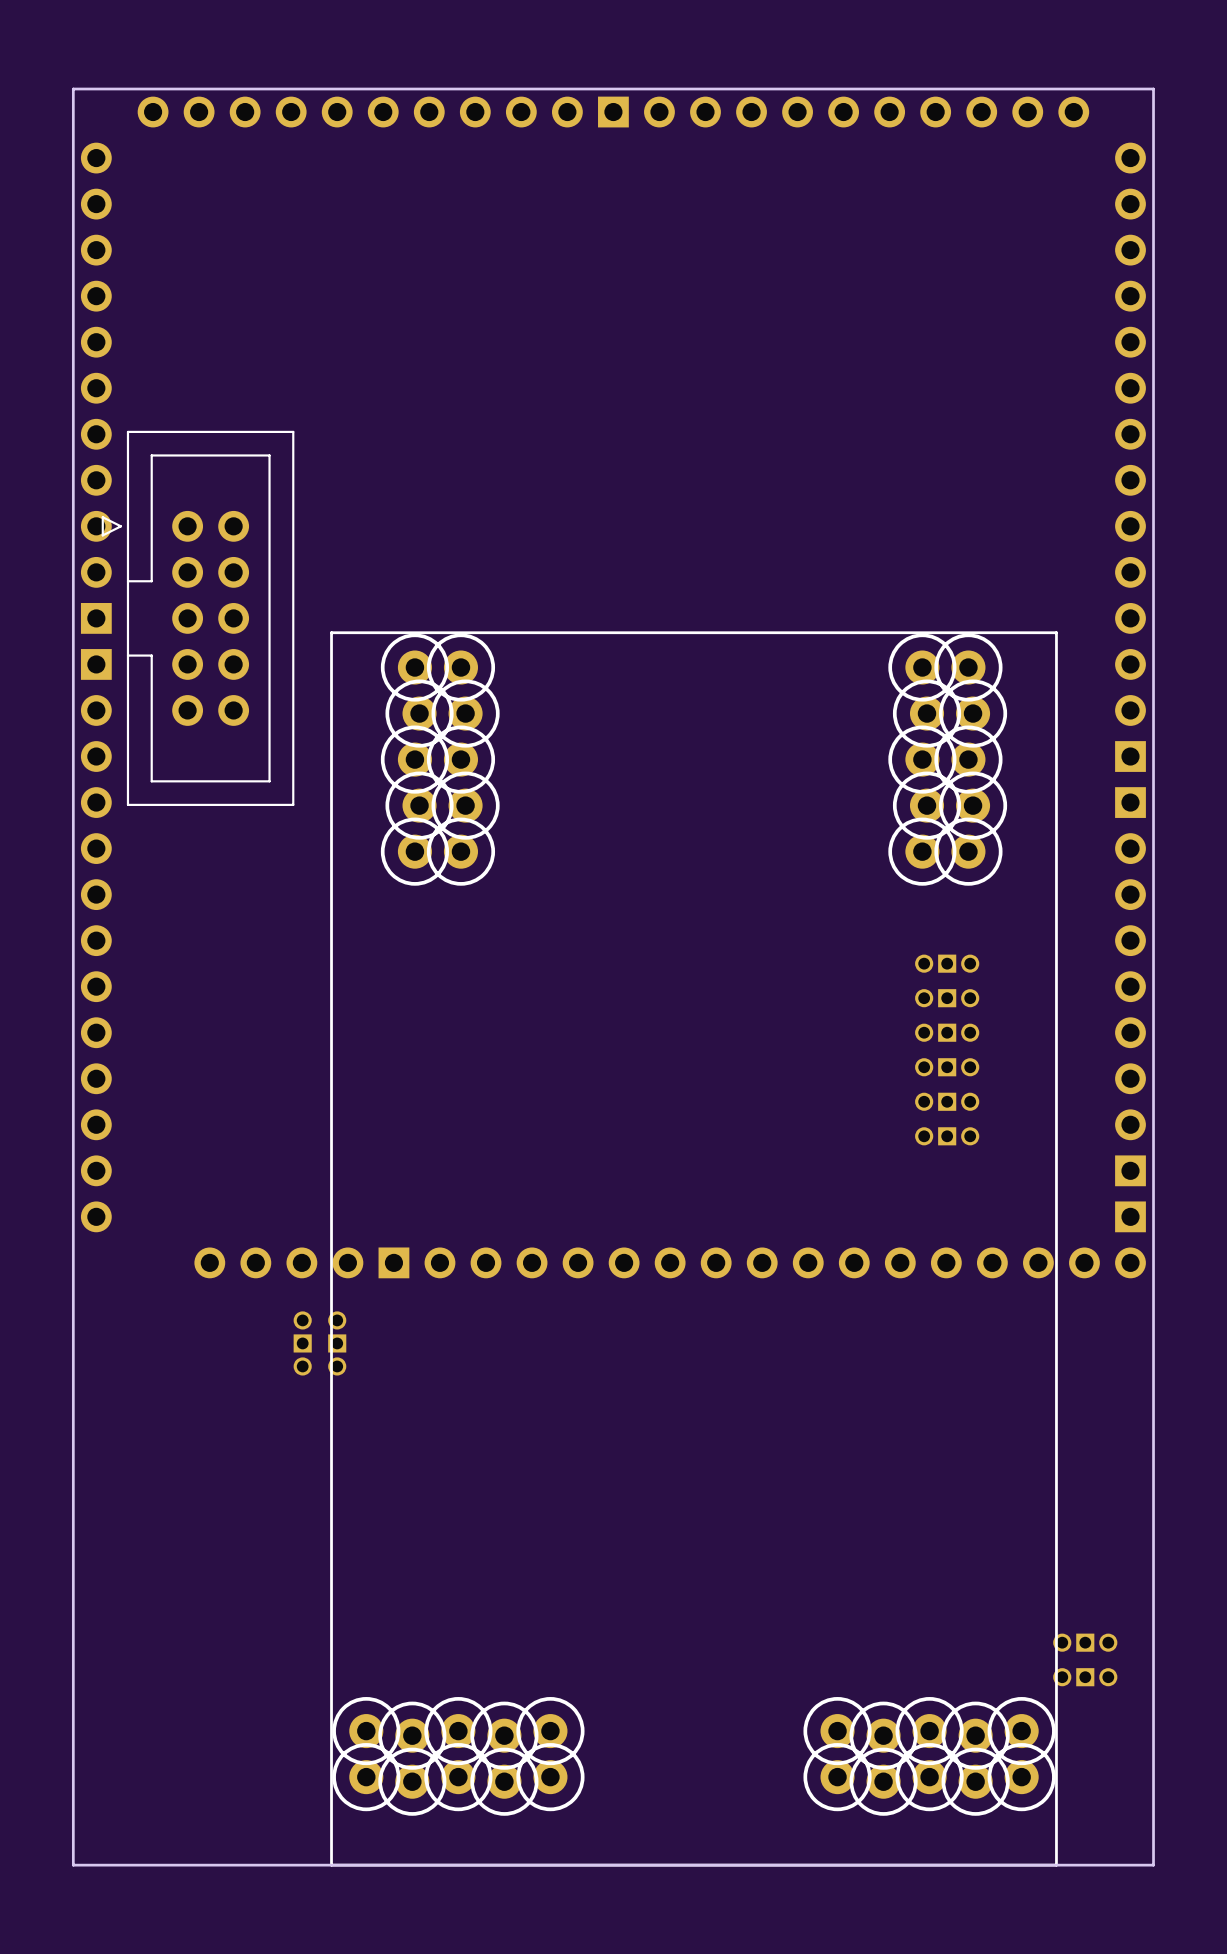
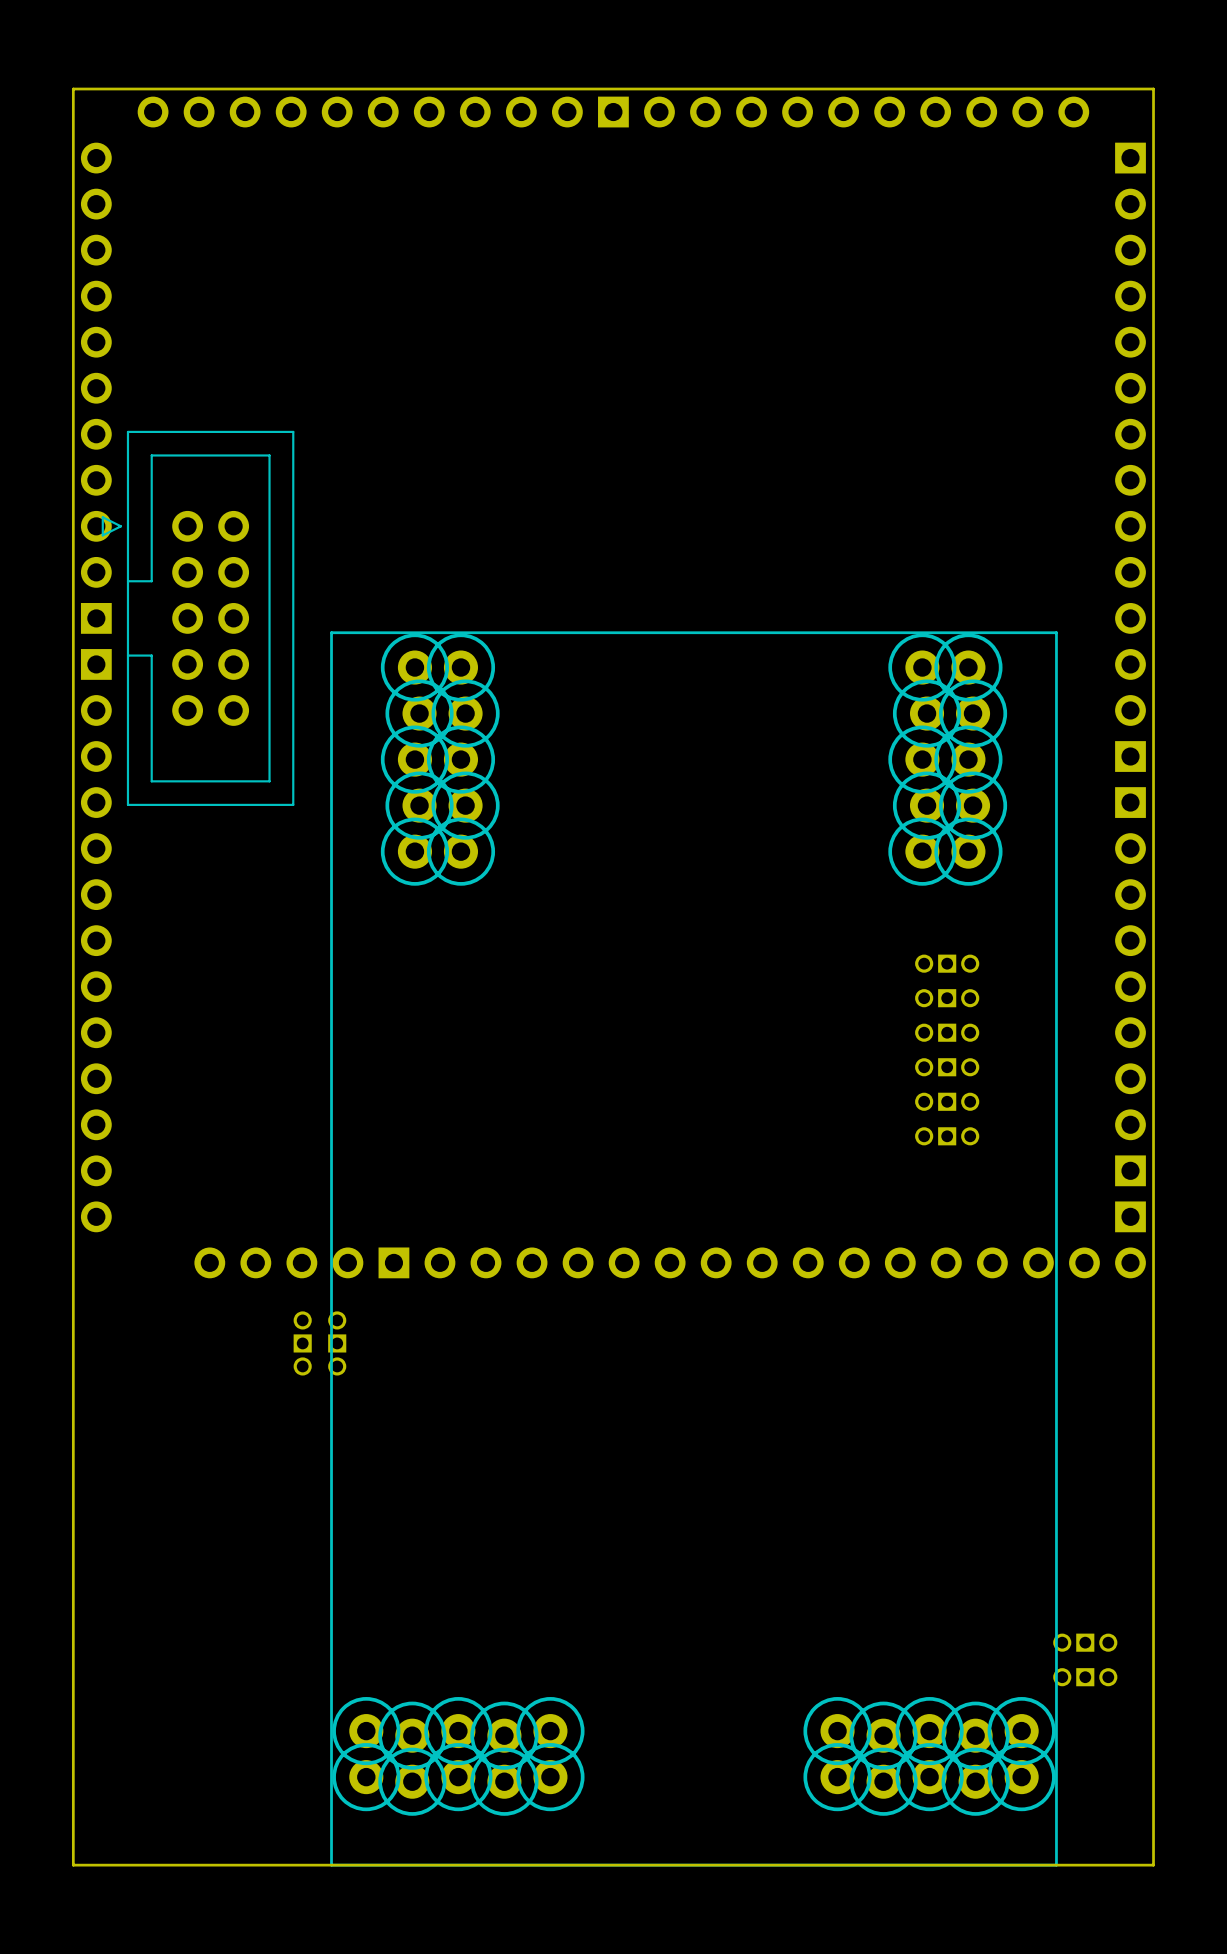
part footprint: [1115, 142, 1146, 1233] -> [1115, 142, 1146, 1233]

